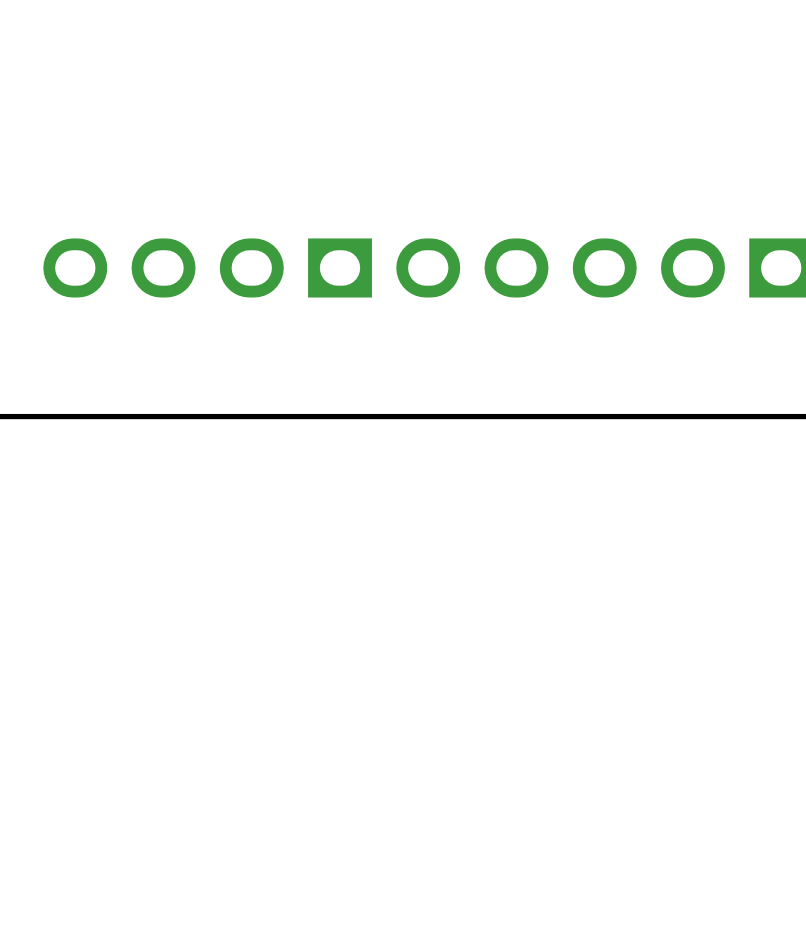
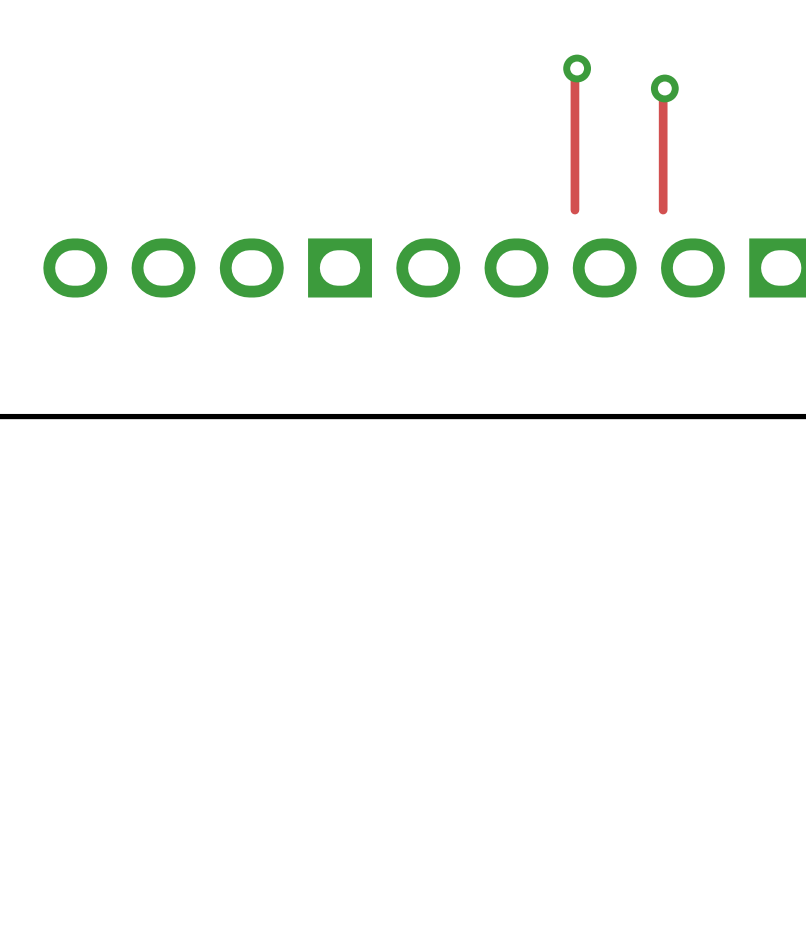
track: none -> (577, 68) (574, 72) (574, 210)
via: none -> (577, 68)
track: none -> (664, 88) (663, 91) (663, 210)
via: none -> (664, 88)

